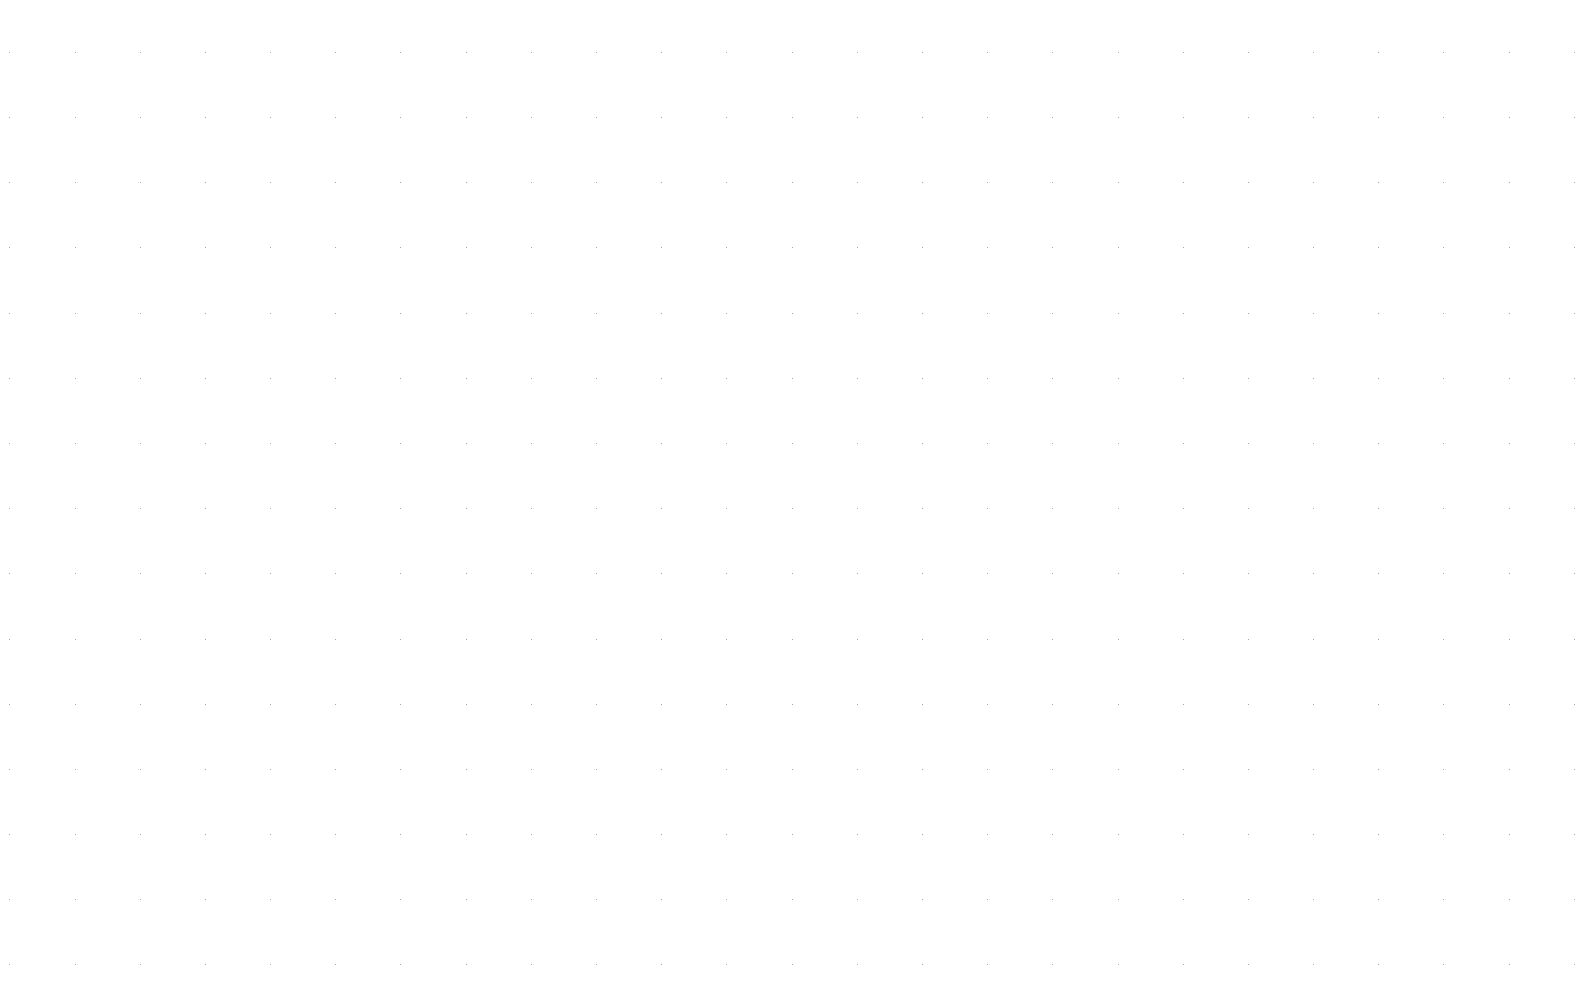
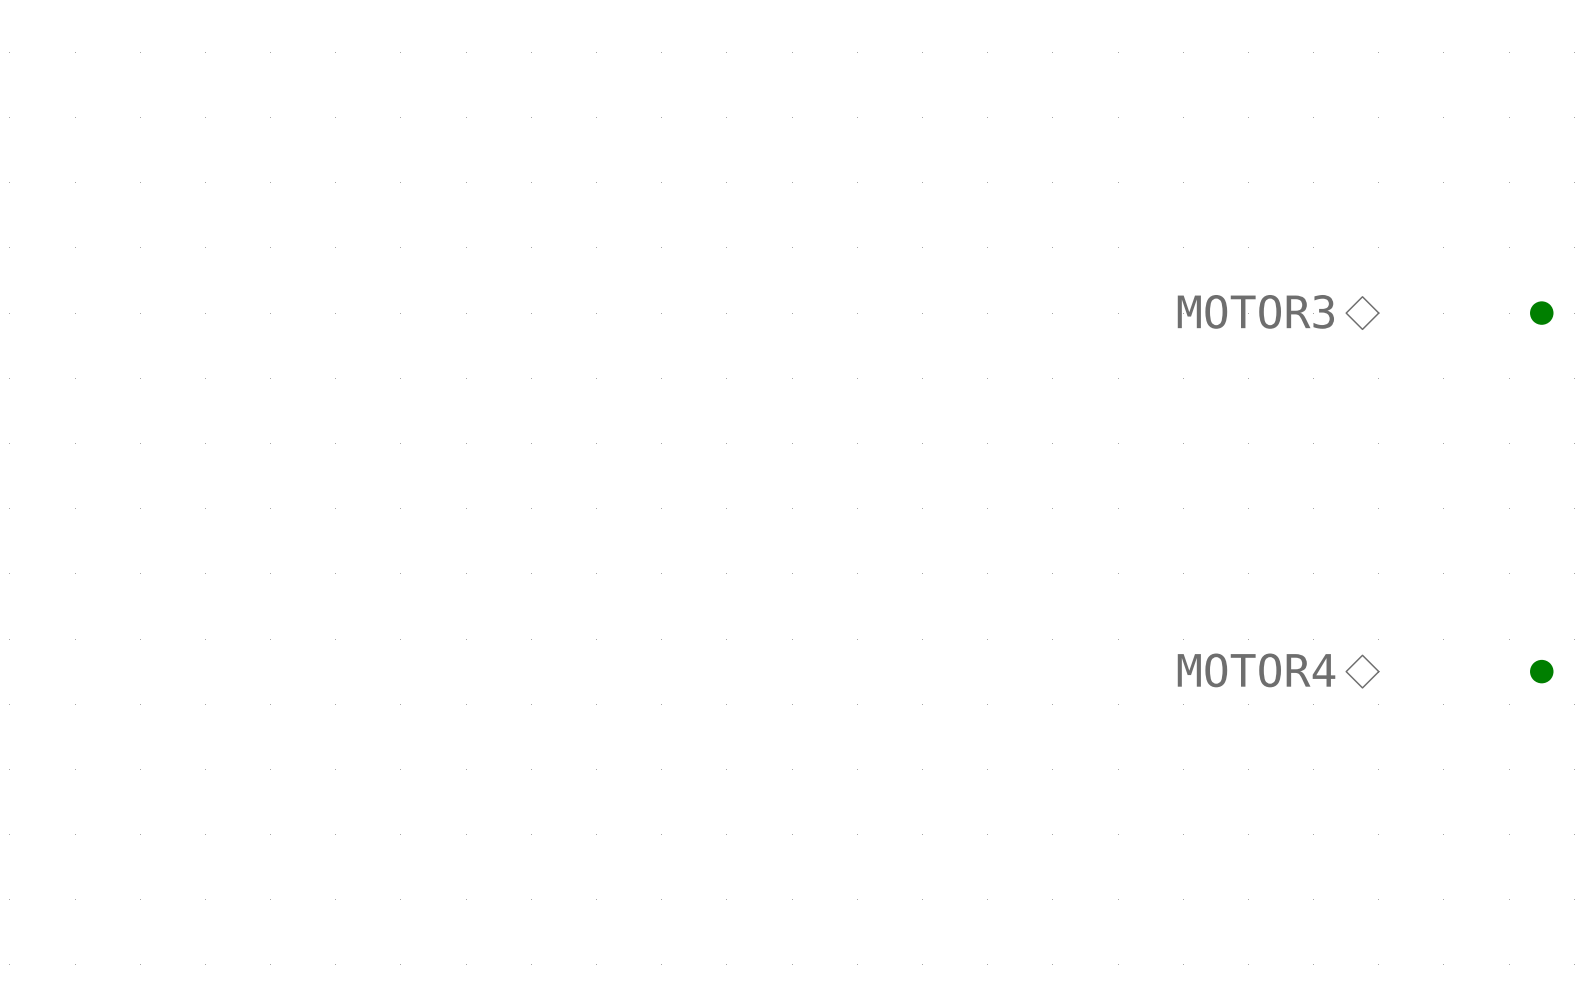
sheet pin: none -> MOTOR3 (1255, 311)
junction: none -> (1541, 313)
sheet pin: none -> MOTOR4 (1256, 670)
junction: none -> (1541, 671)

